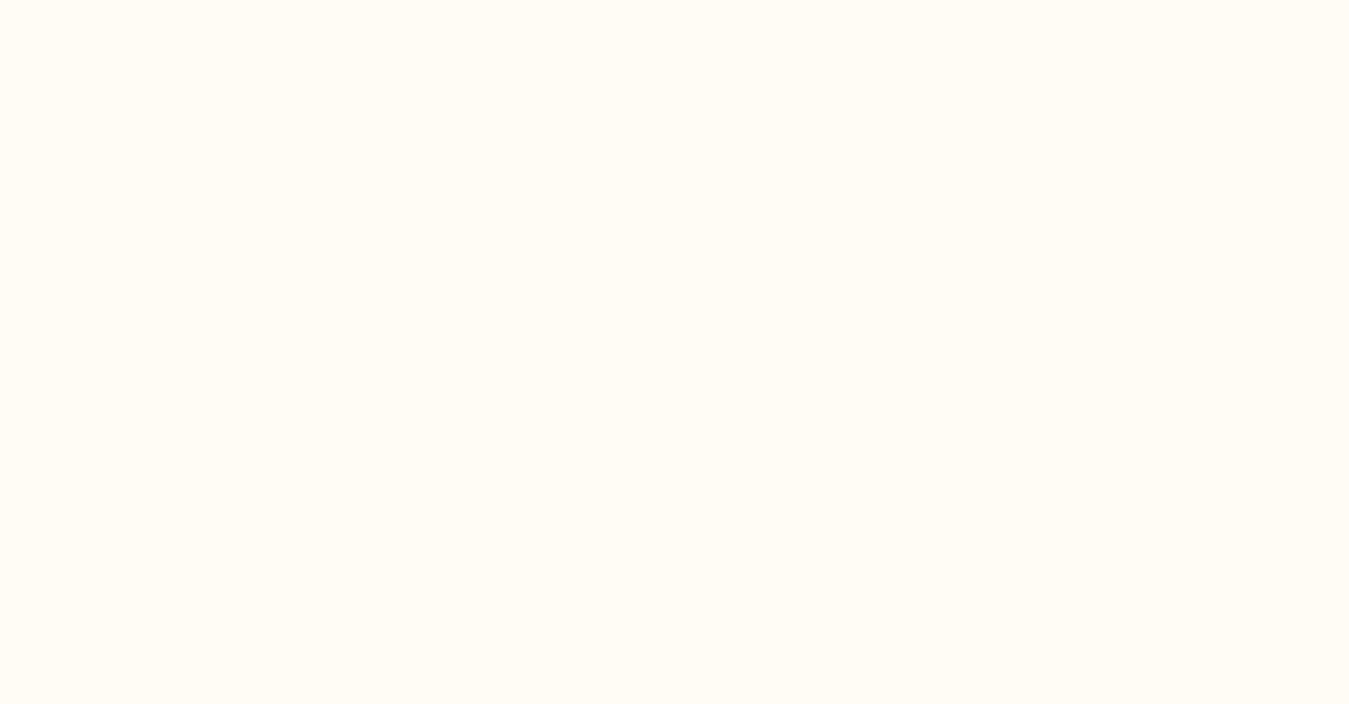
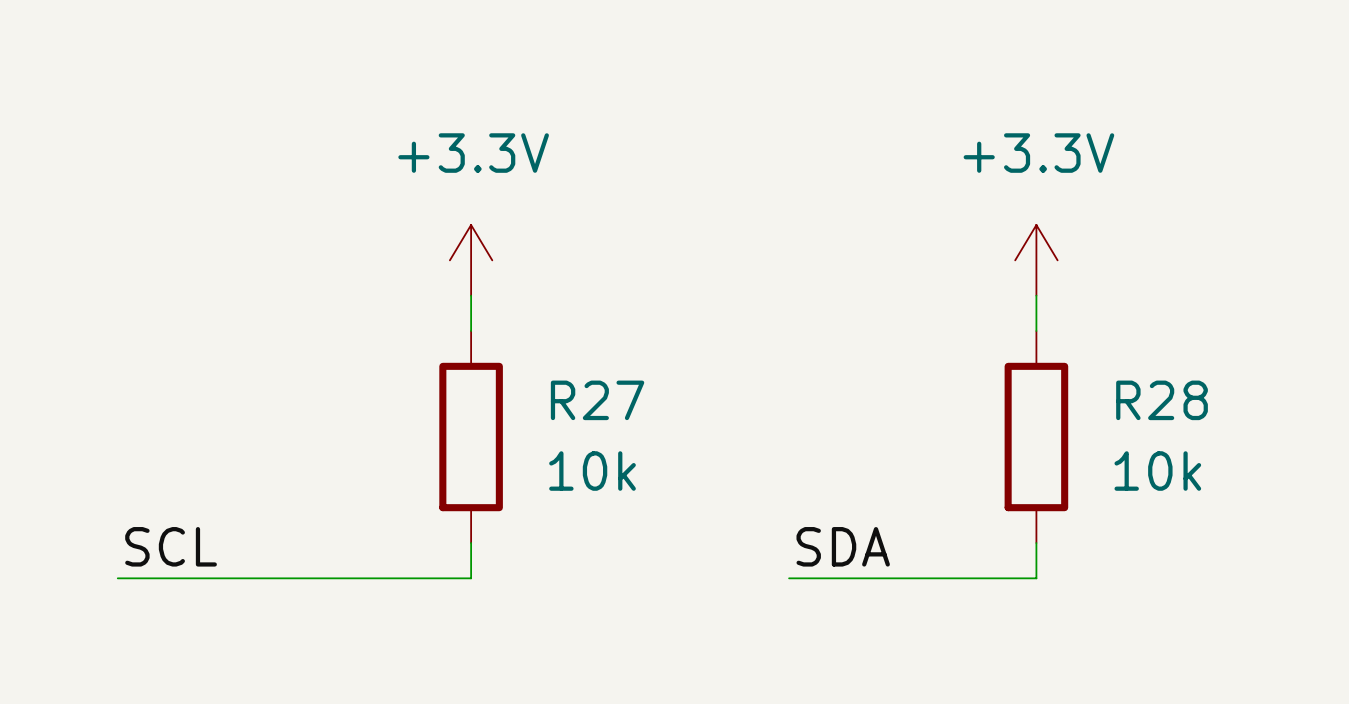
power symbol: none -> +3.3V (471, 260)
power symbol: none -> +3.3V (1036, 260)
wire: none -> (471, 295) (471, 331)
wire: none -> (1036, 295) (1036, 331)
R27: none -> 10k (471, 437)
R28: none -> 10k (1036, 437)
wire: none -> (471, 543) (471, 578) (117, 578)
wire: none -> (1036, 543) (1036, 578) (789, 578)
label: none -> SCL (171, 546)
label: none -> SDA (843, 546)

